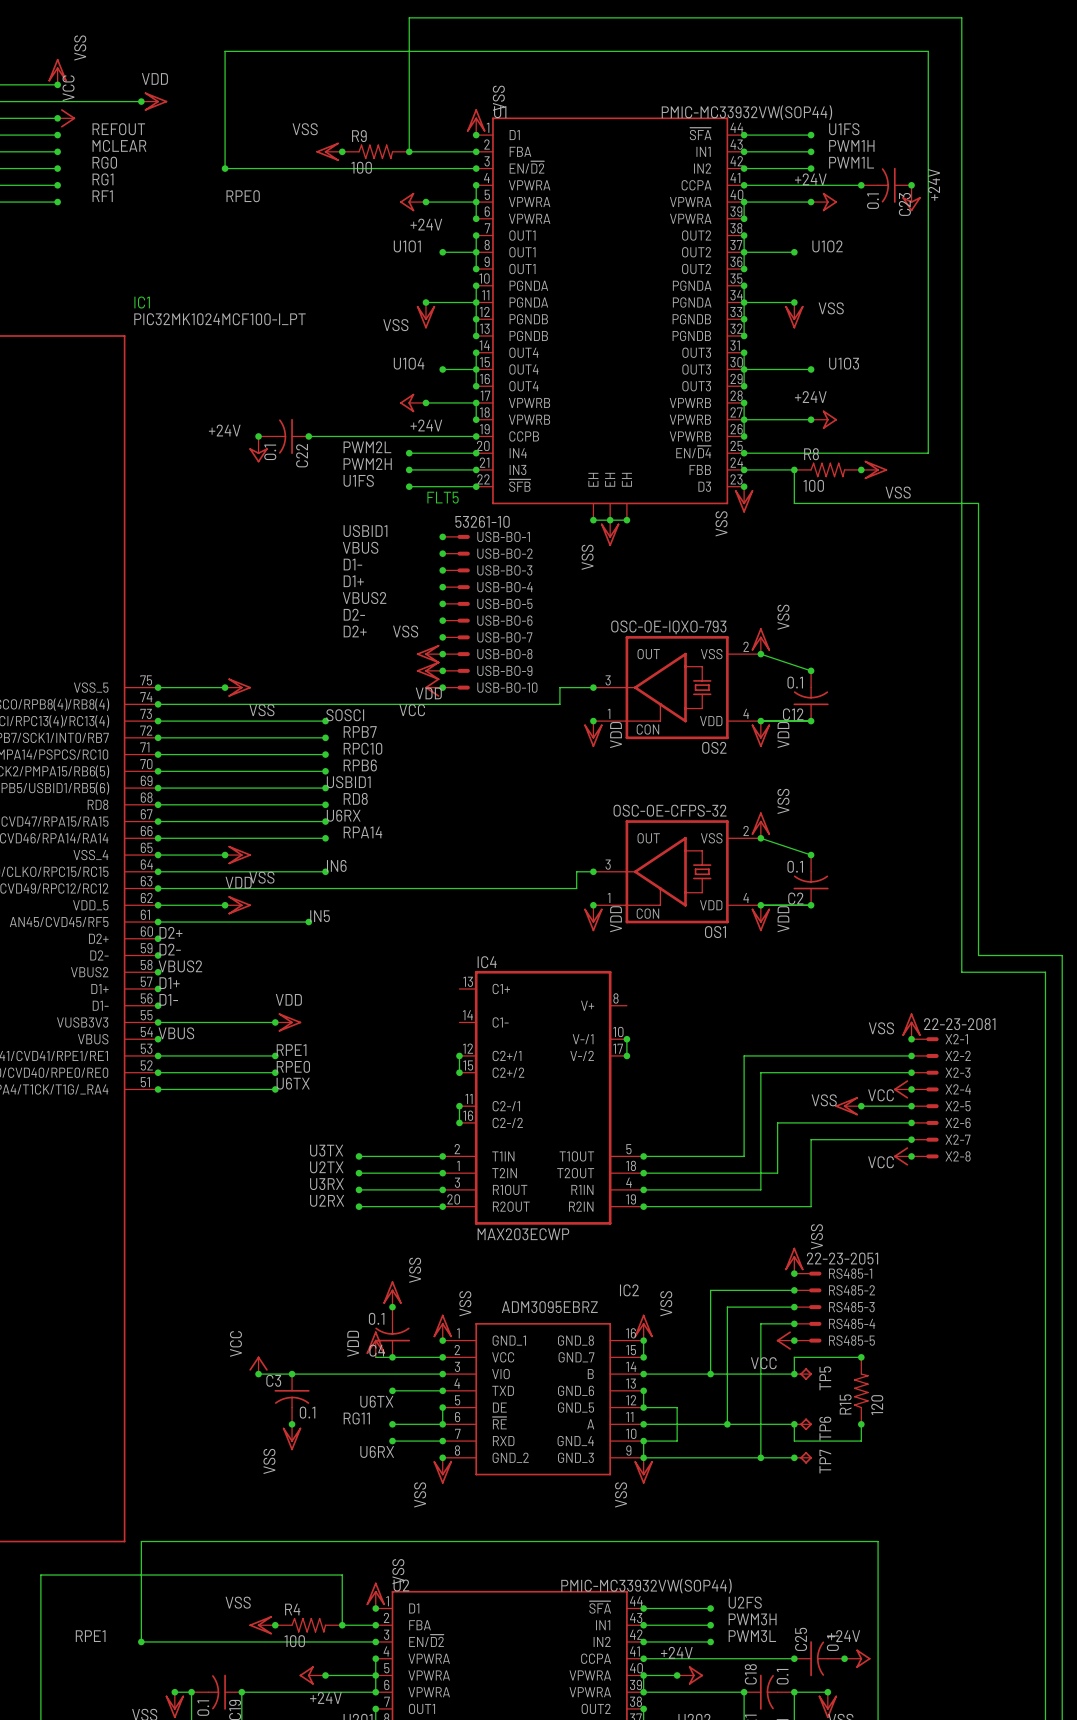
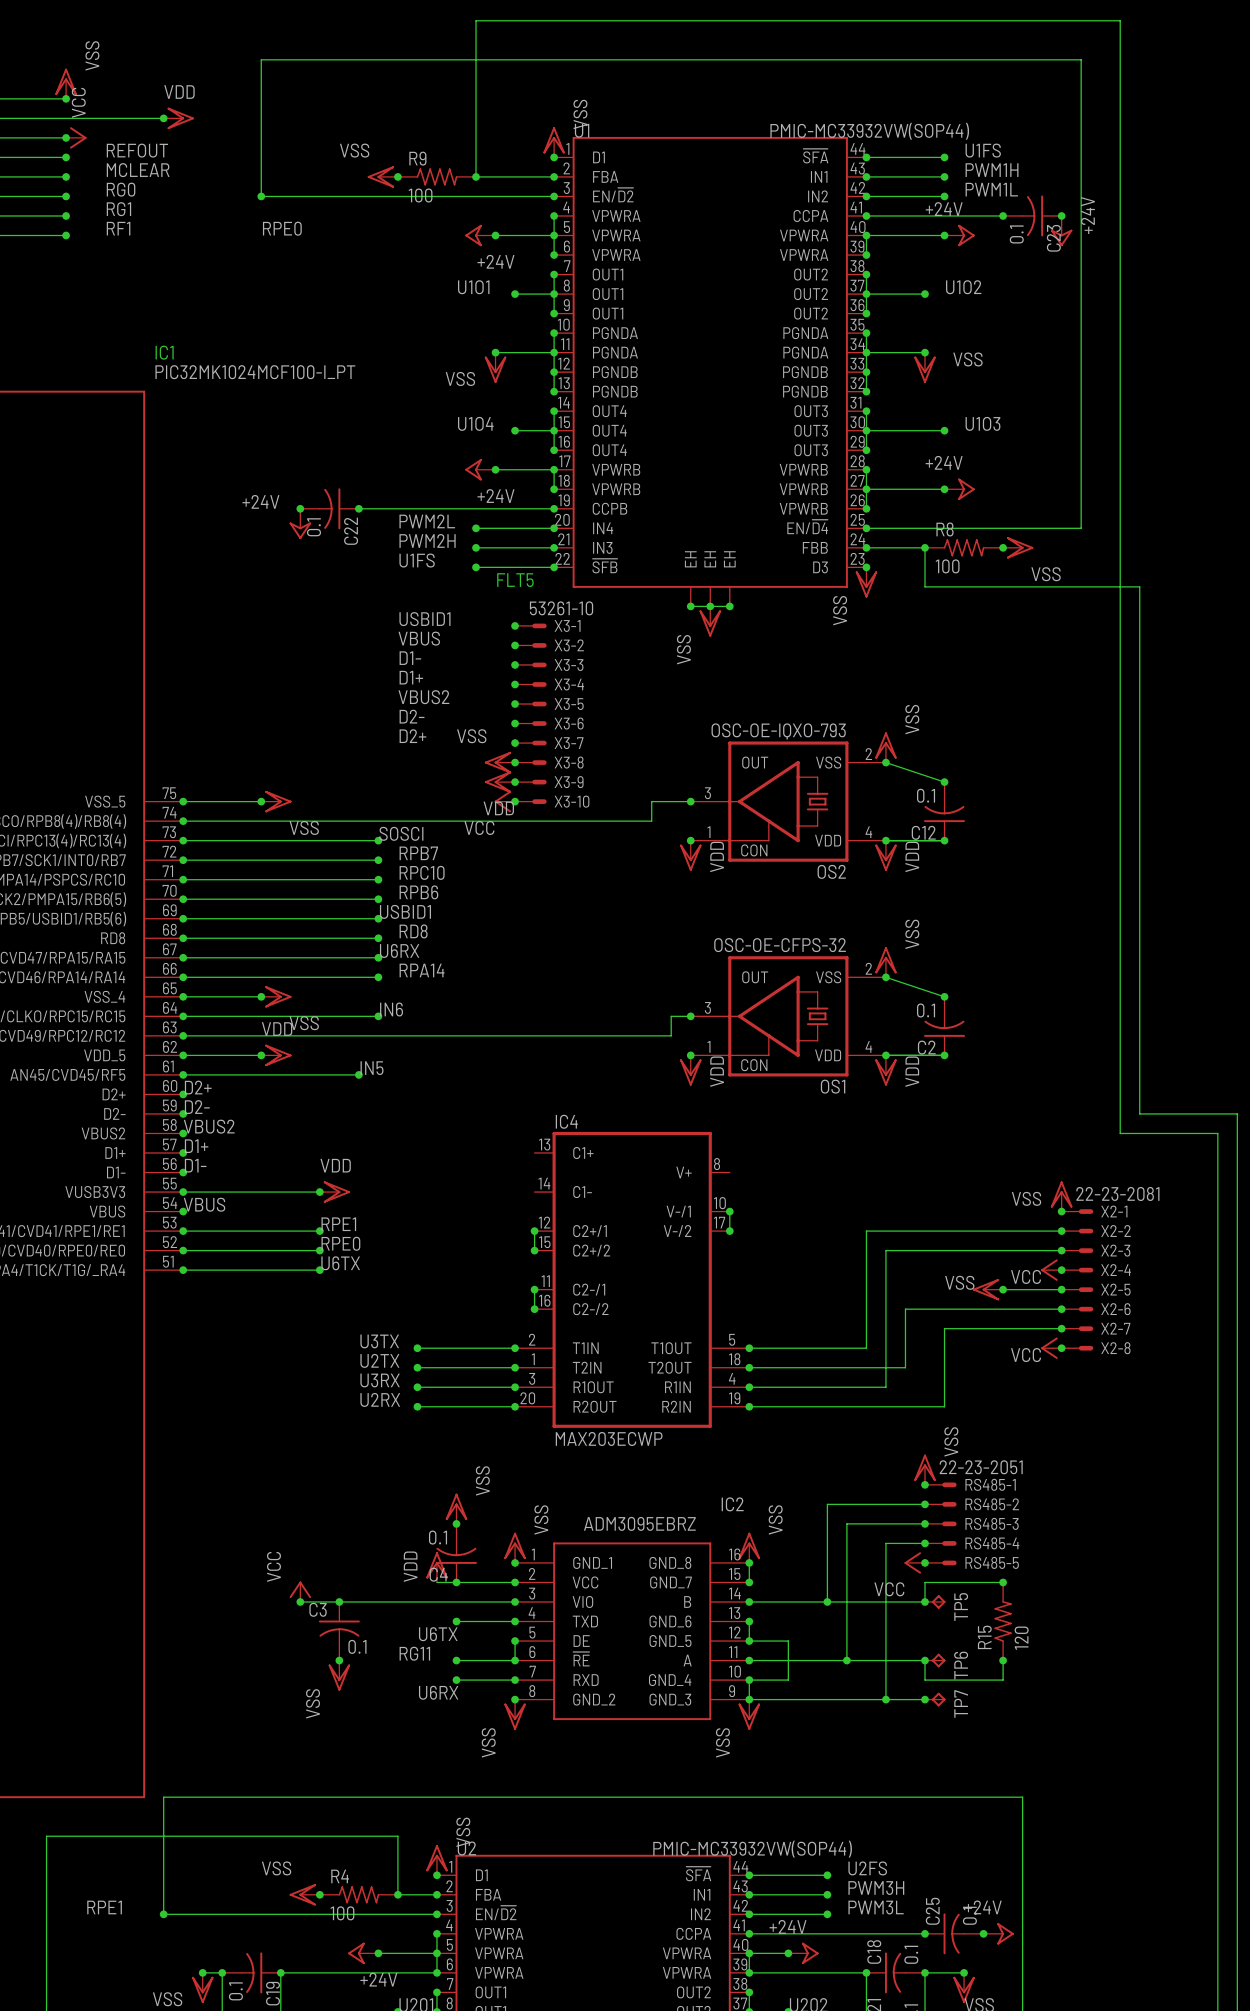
USB-BO-1 name: USB-BO-1 (503, 536) -> X3-1 (567, 625)
USB-BO-2 name: USB-BO-2 (505, 553) -> X3-2 (569, 645)
USB-BO-3 name: USB-BO-3 (504, 570) -> X3-3 (569, 665)
USB-BO-4 name: USB-BO-4 (505, 587) -> X3-4 (569, 684)
USB-BO-5 name: USB-BO-5 (504, 603) -> X3-5 (569, 704)
USB-BO-6 name: USB-BO-6 (504, 620) -> X3-6 (569, 723)
USB-BO-7 name: USB-BO-7 (504, 637) -> X3-7 (569, 743)
USB-BO-8 name: USB-BO-8 (504, 654) -> X3-8 (569, 762)
USB-BO-9 name: USB-BO-9 (504, 670) -> X3-9 (569, 782)
USB-BO-10 name: USB-BO-10 (507, 687) -> X3-10 (572, 801)

